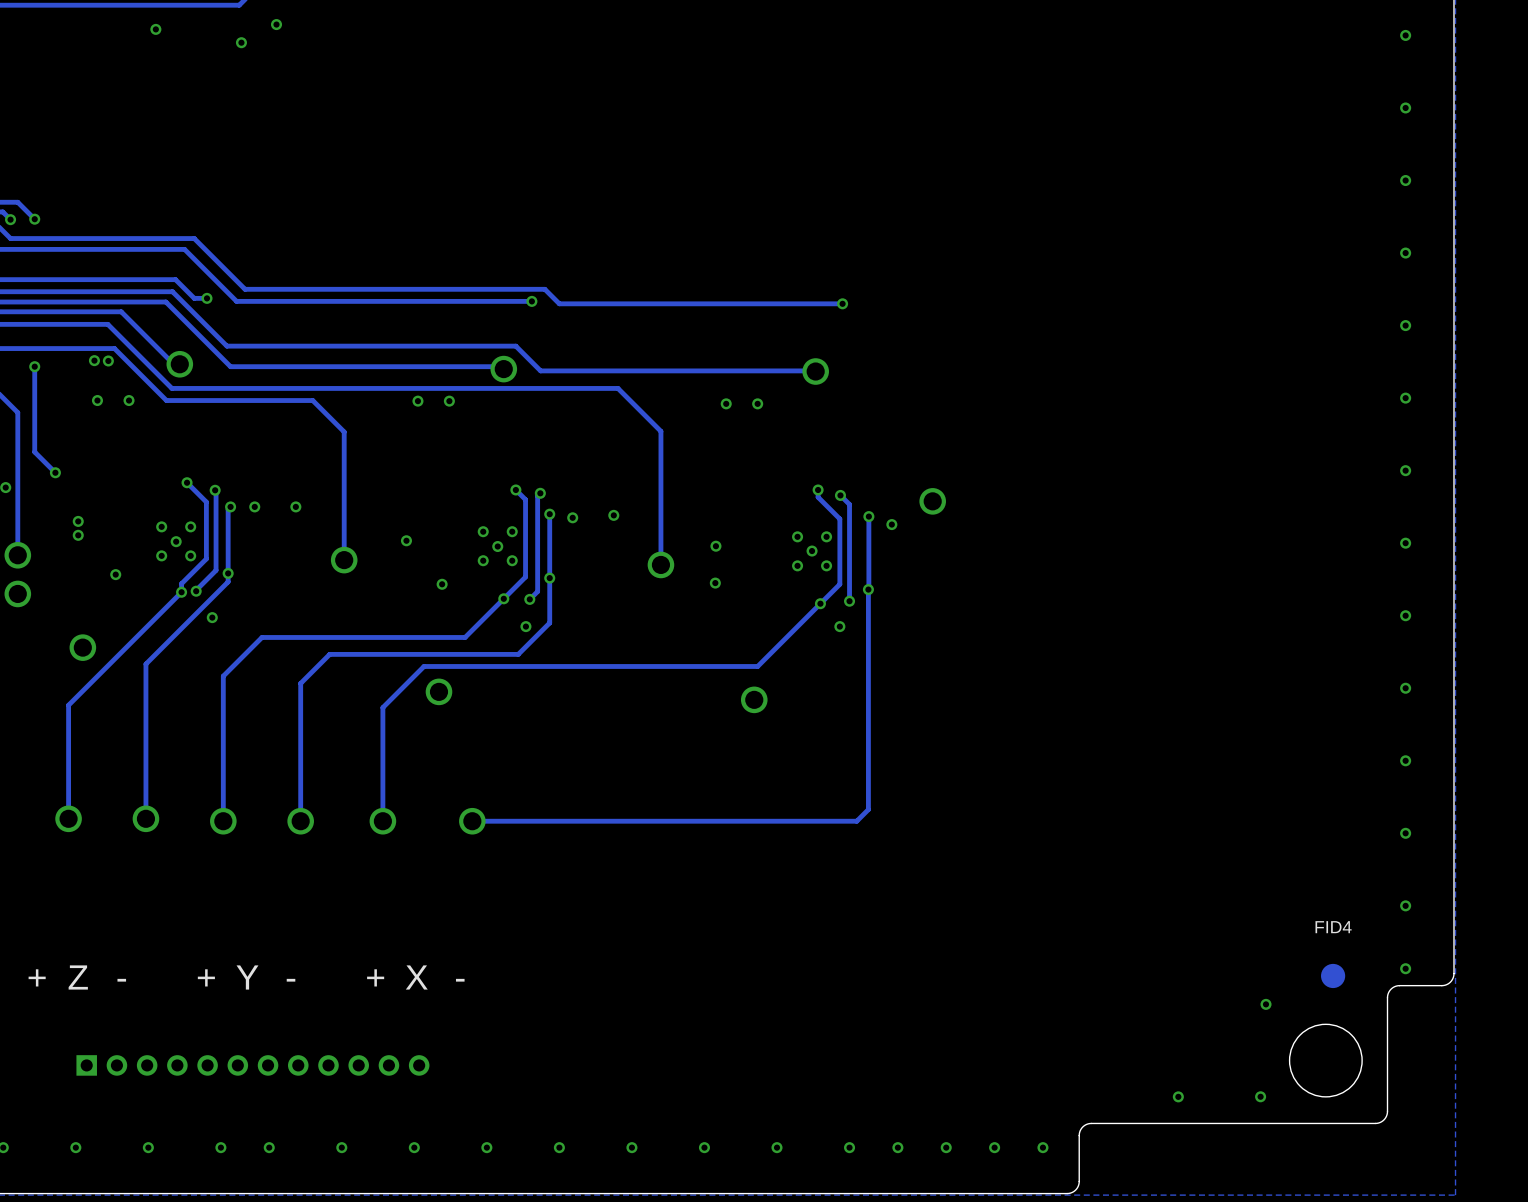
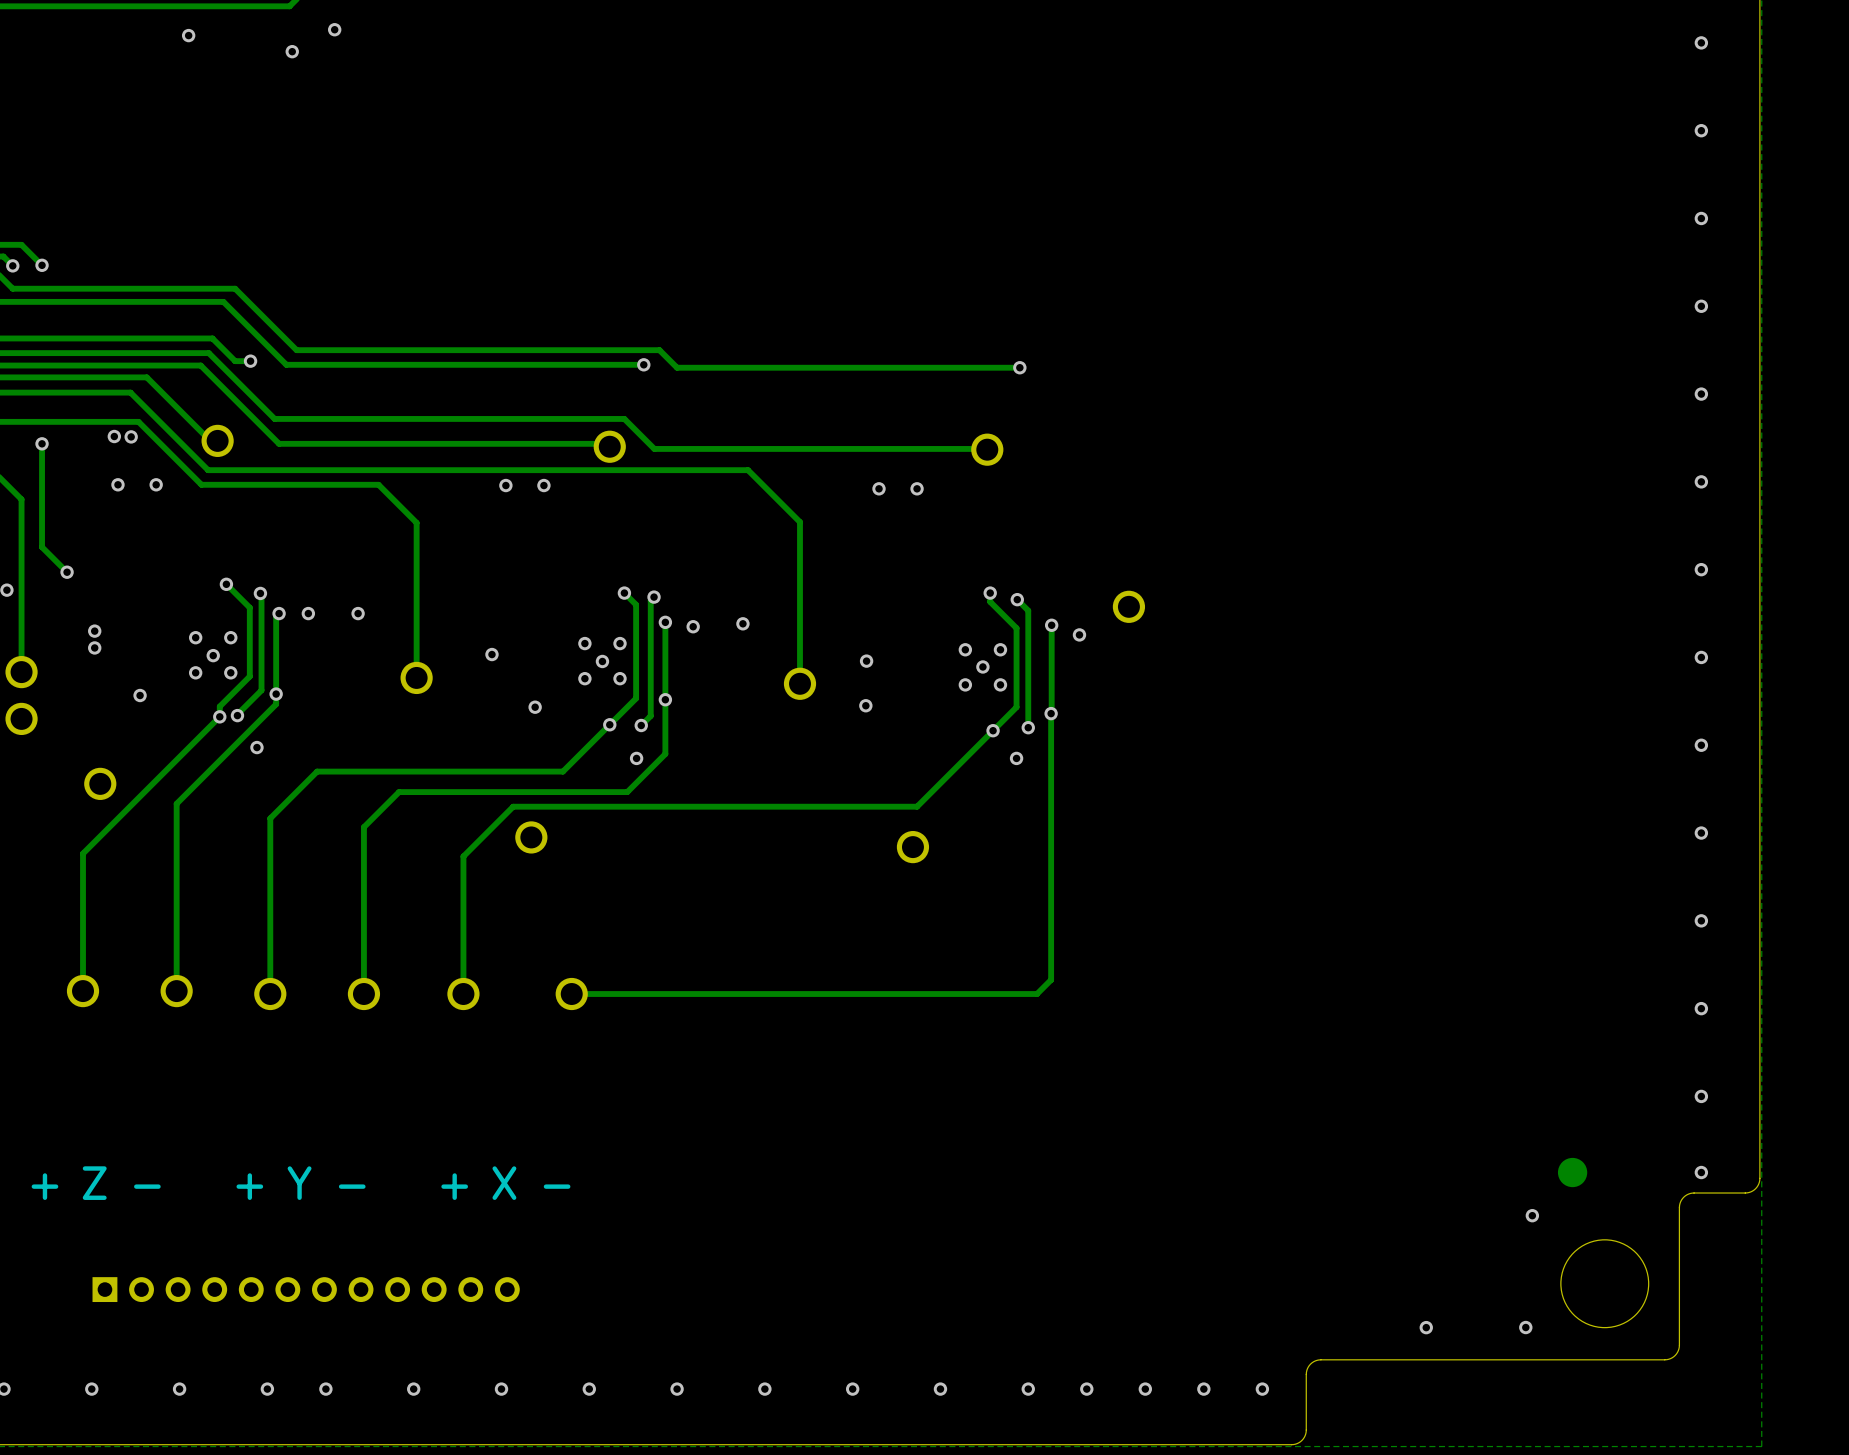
part: none -> (1572, 1172)
FID4: (1333, 975) -> none

